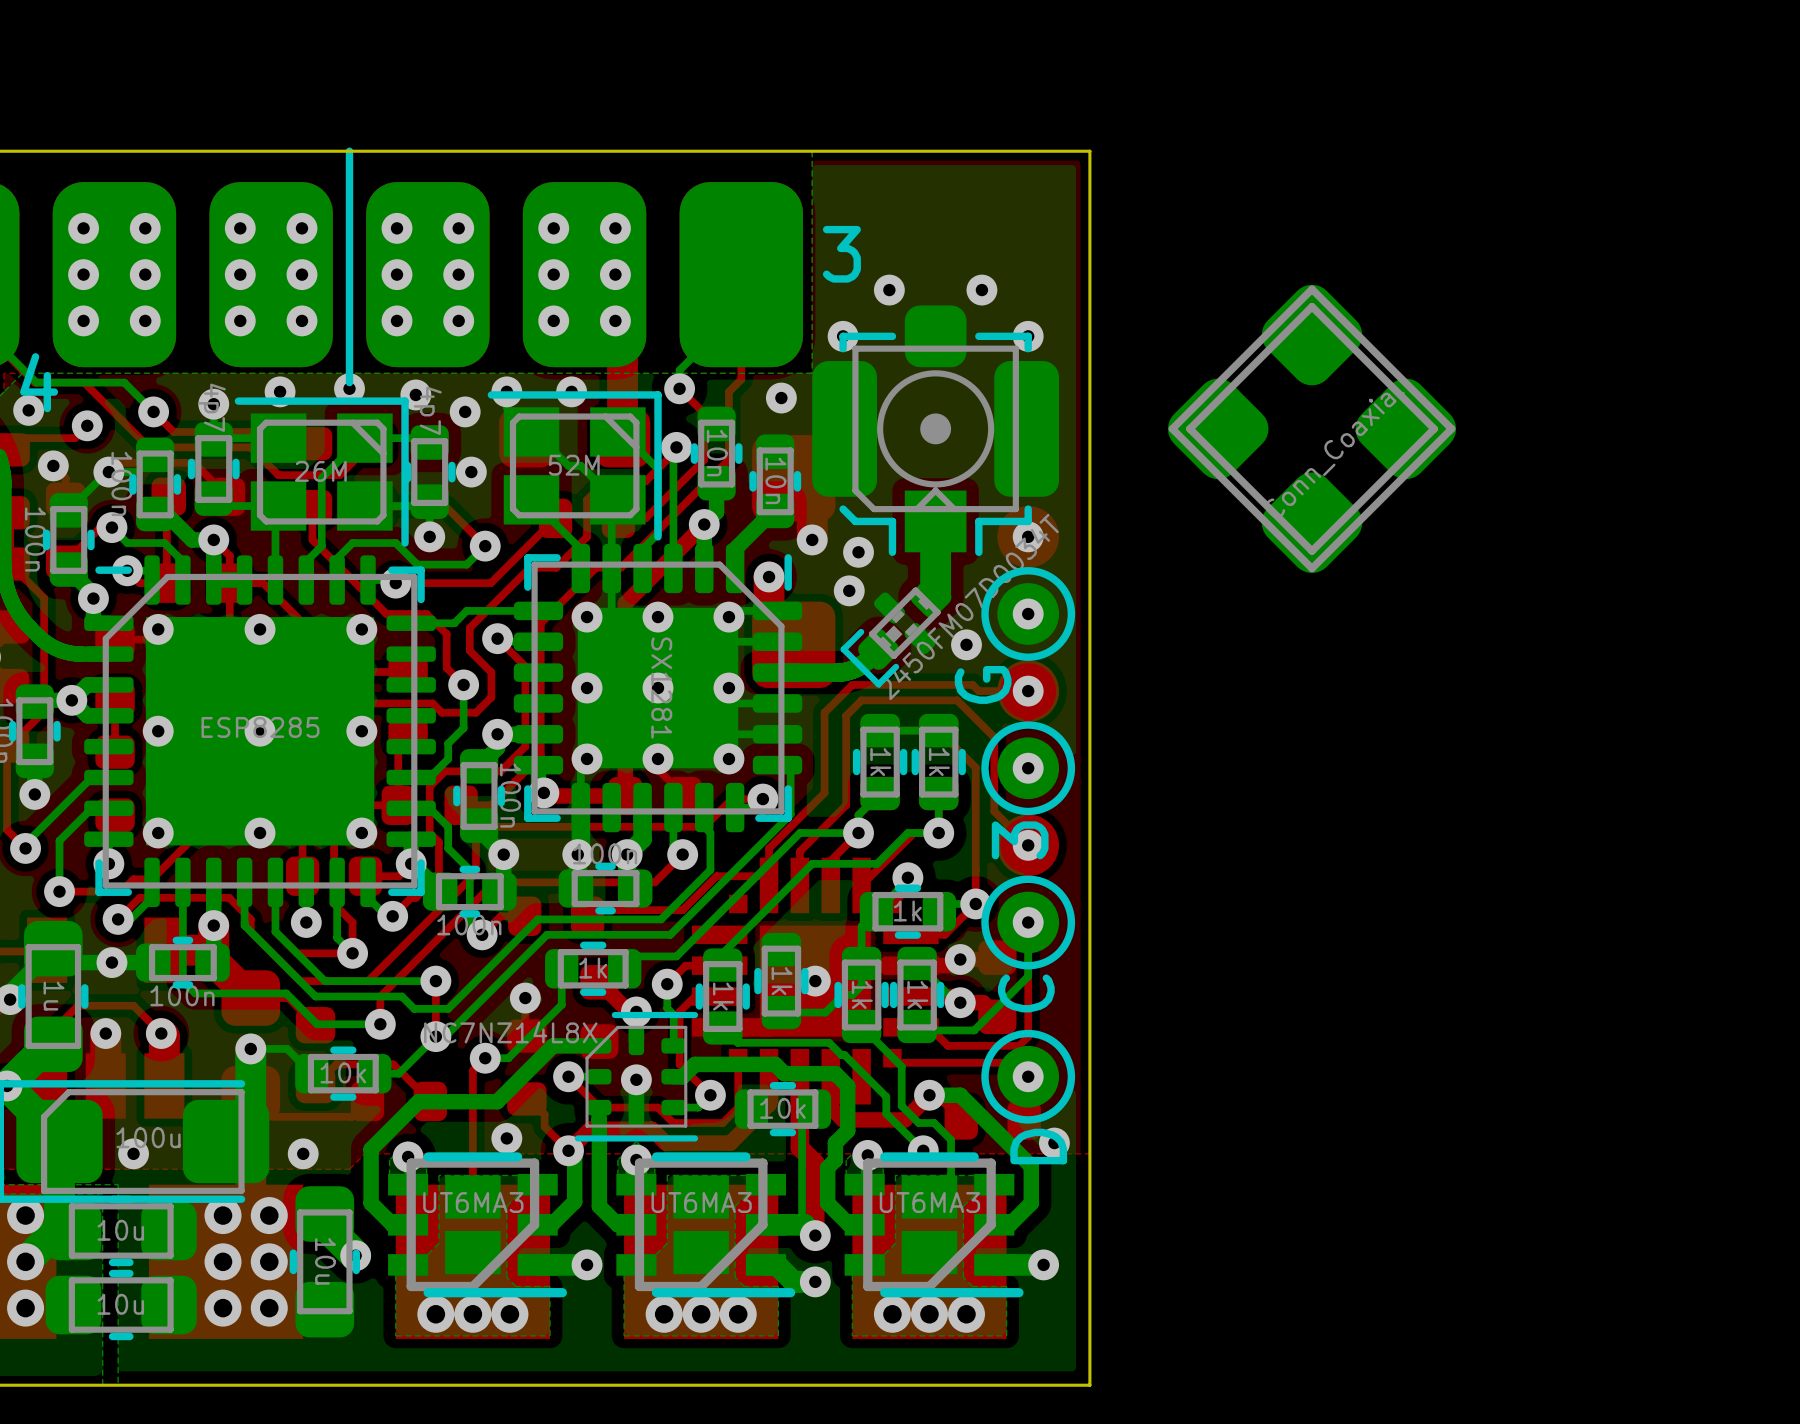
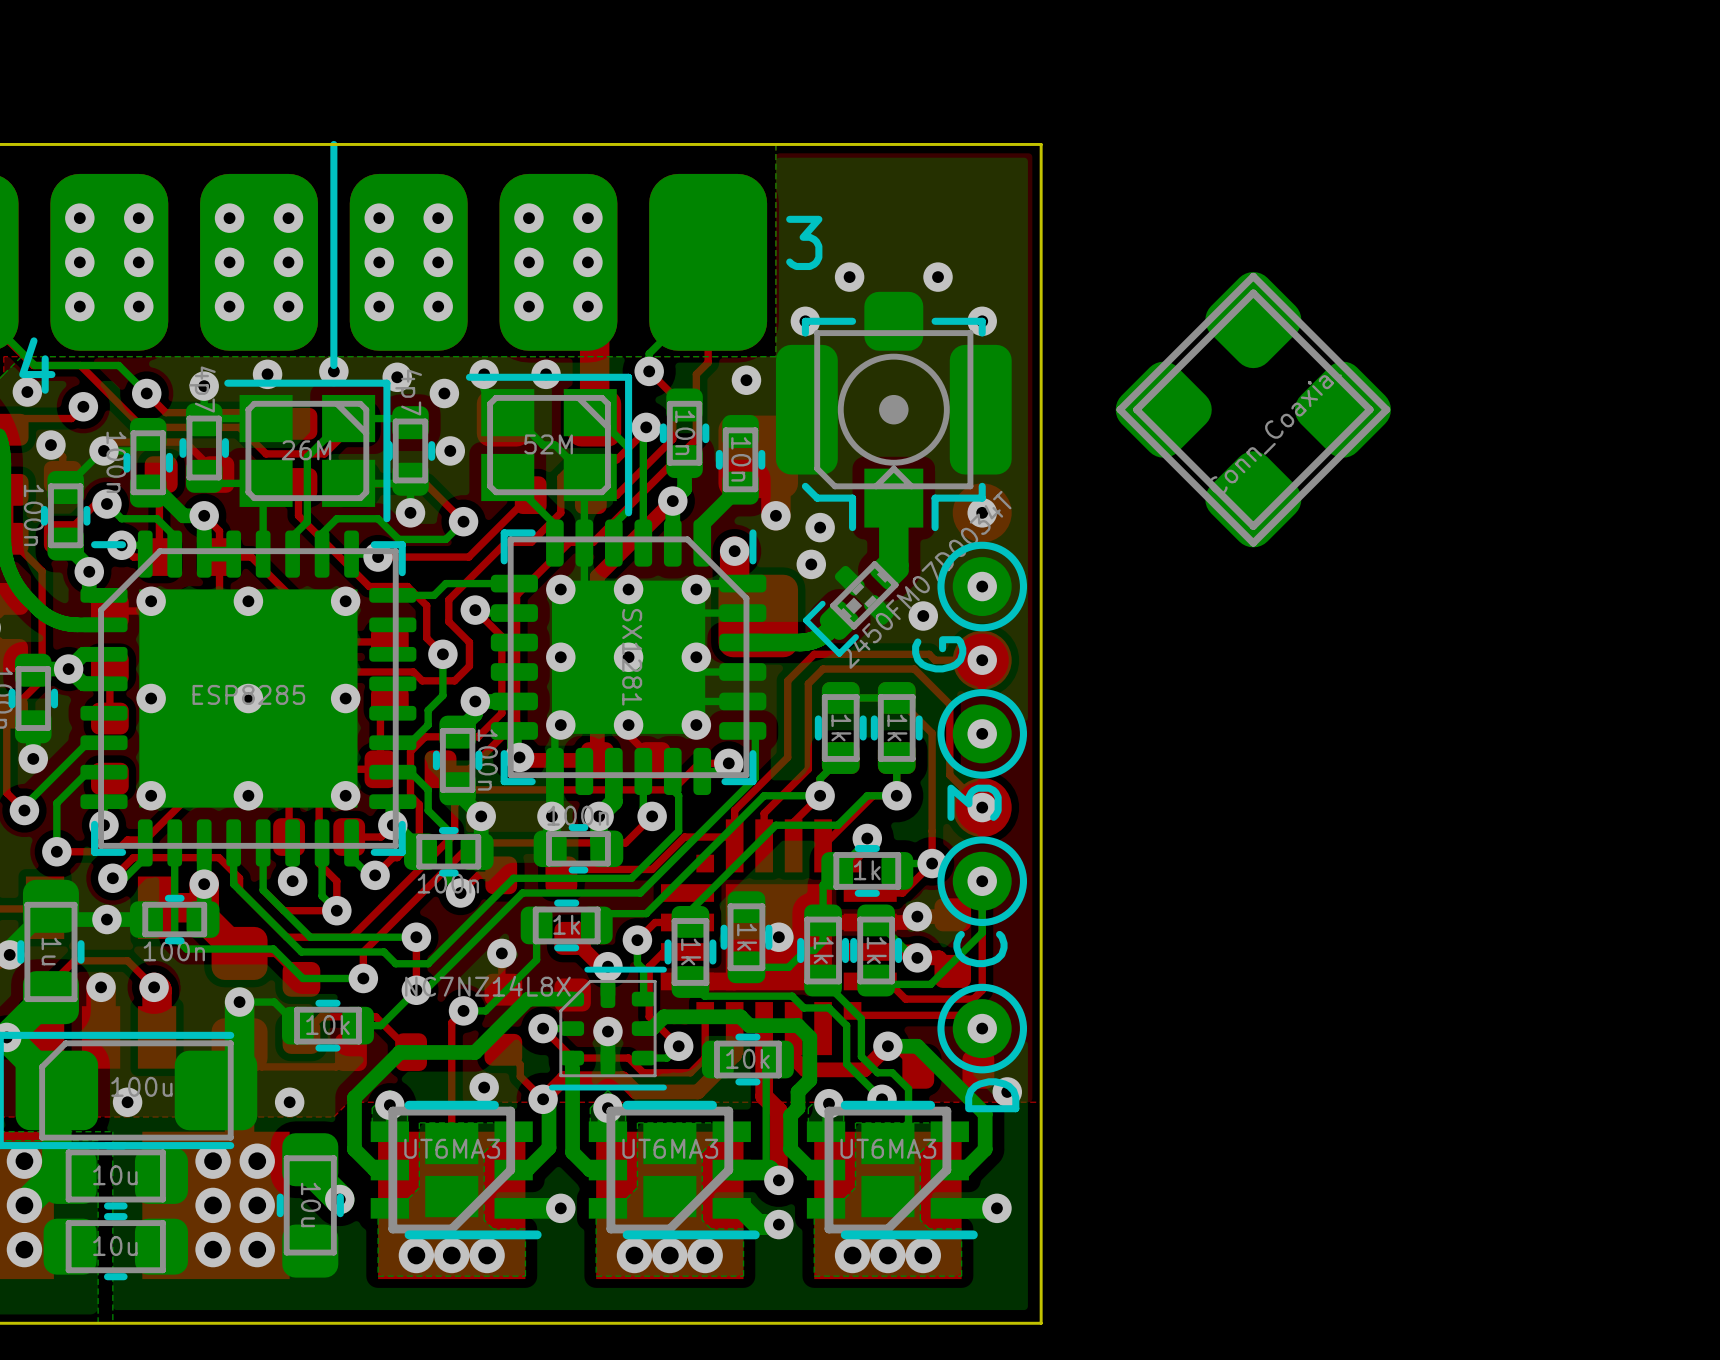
bottom track: (844, 1055) (886, 1096) -> (806, 1007) (828, 1007) (846, 1025) (846, 1047)

